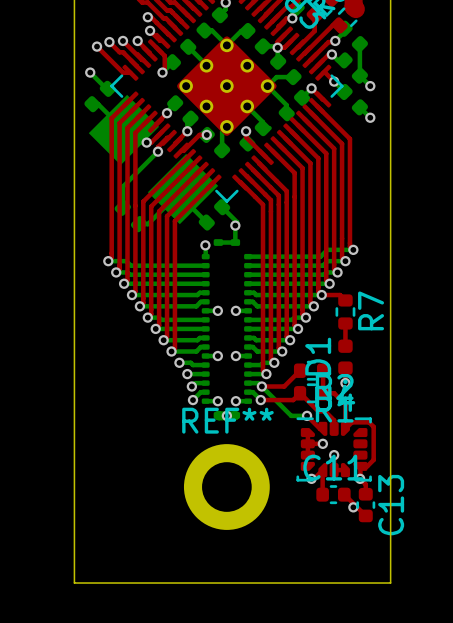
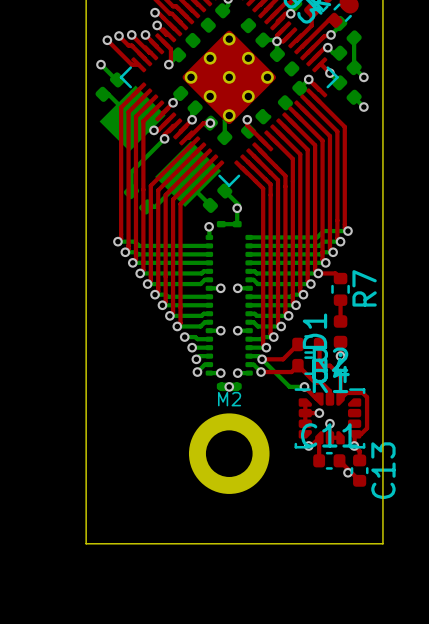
bottom track: (204, 30) (212, 30) (226, 45) (241, 31) -> none
bottom track: (189, 45) (188, 46) (206, 65) -> none
bottom track: (293, 77) (276, 77) (267, 86) (286, 105) (286, 113) -> none
bottom track: (247, 106) (262, 122) -> none
REF** name: REF** (227, 420) -> M2 (229, 399)

